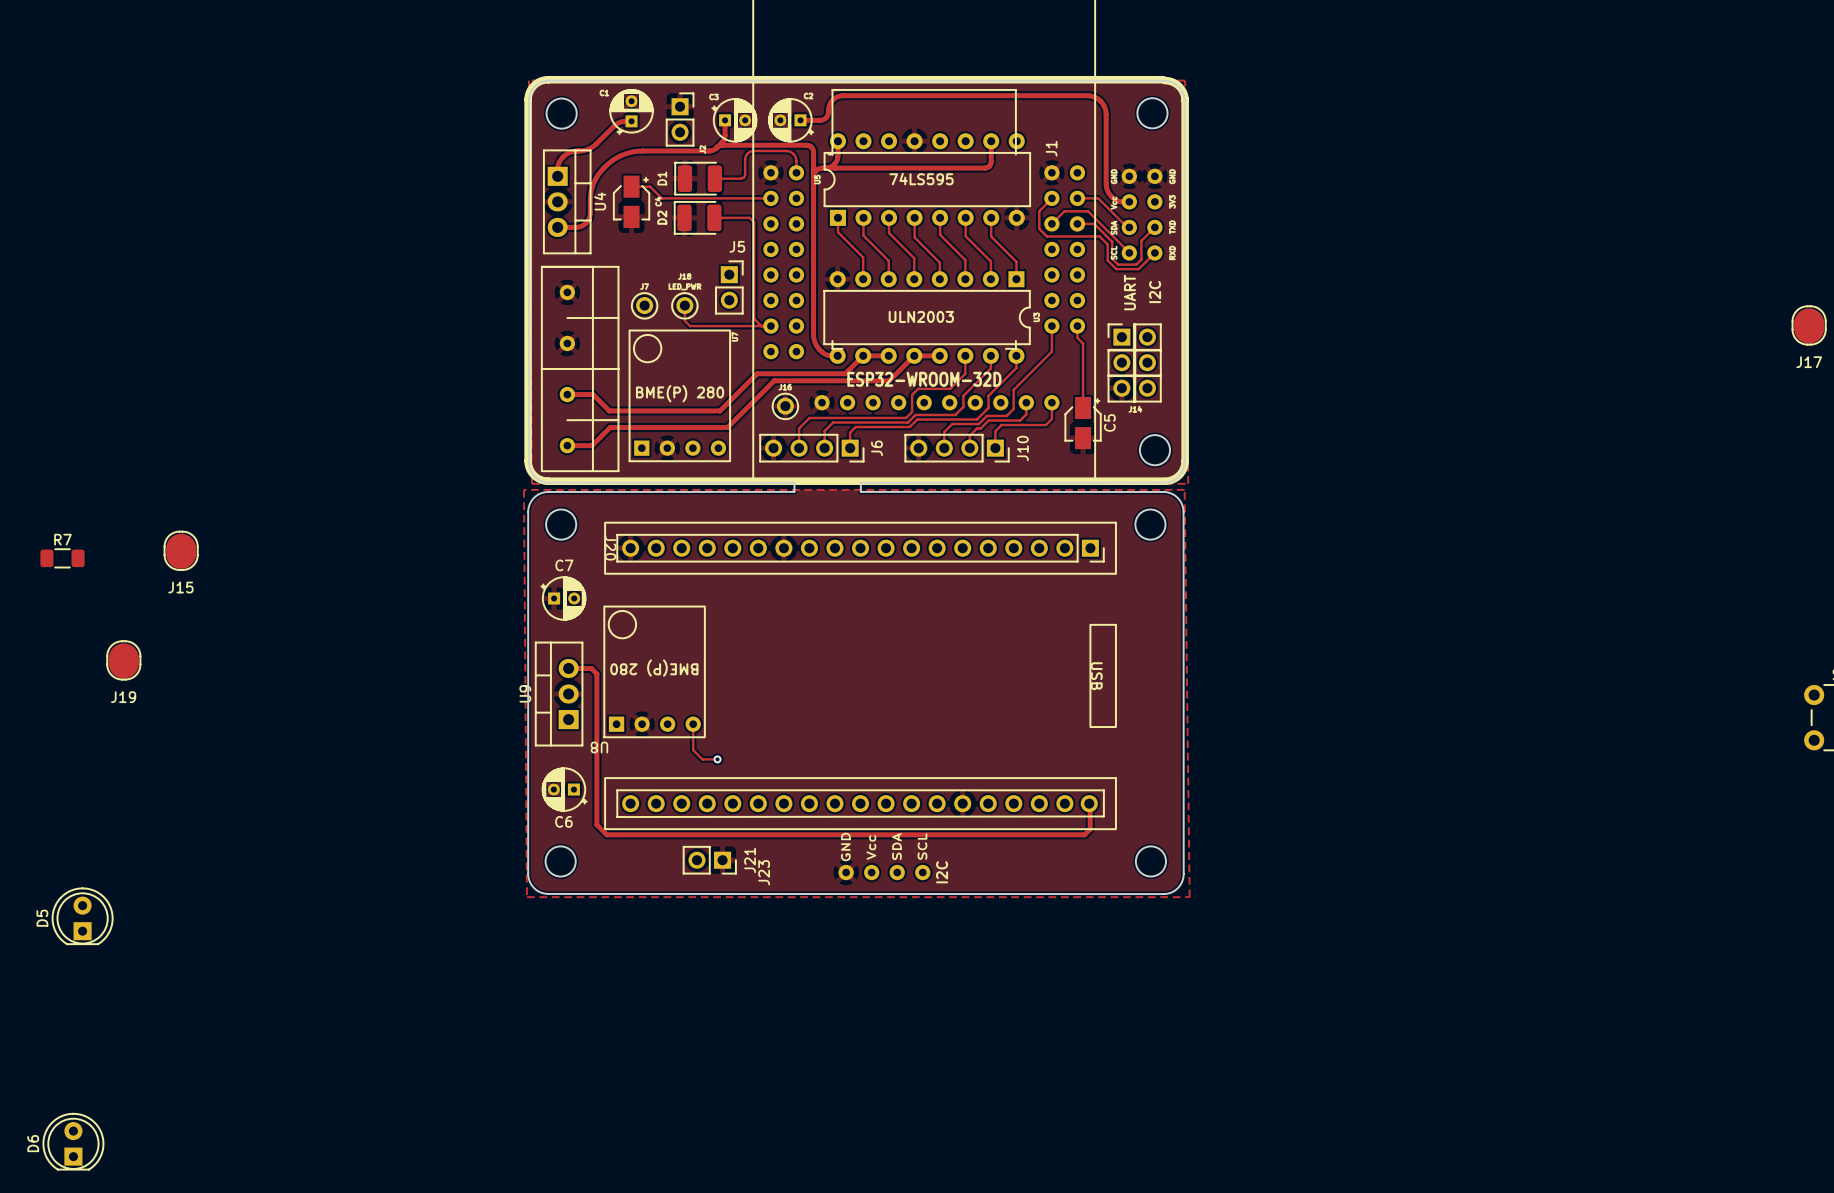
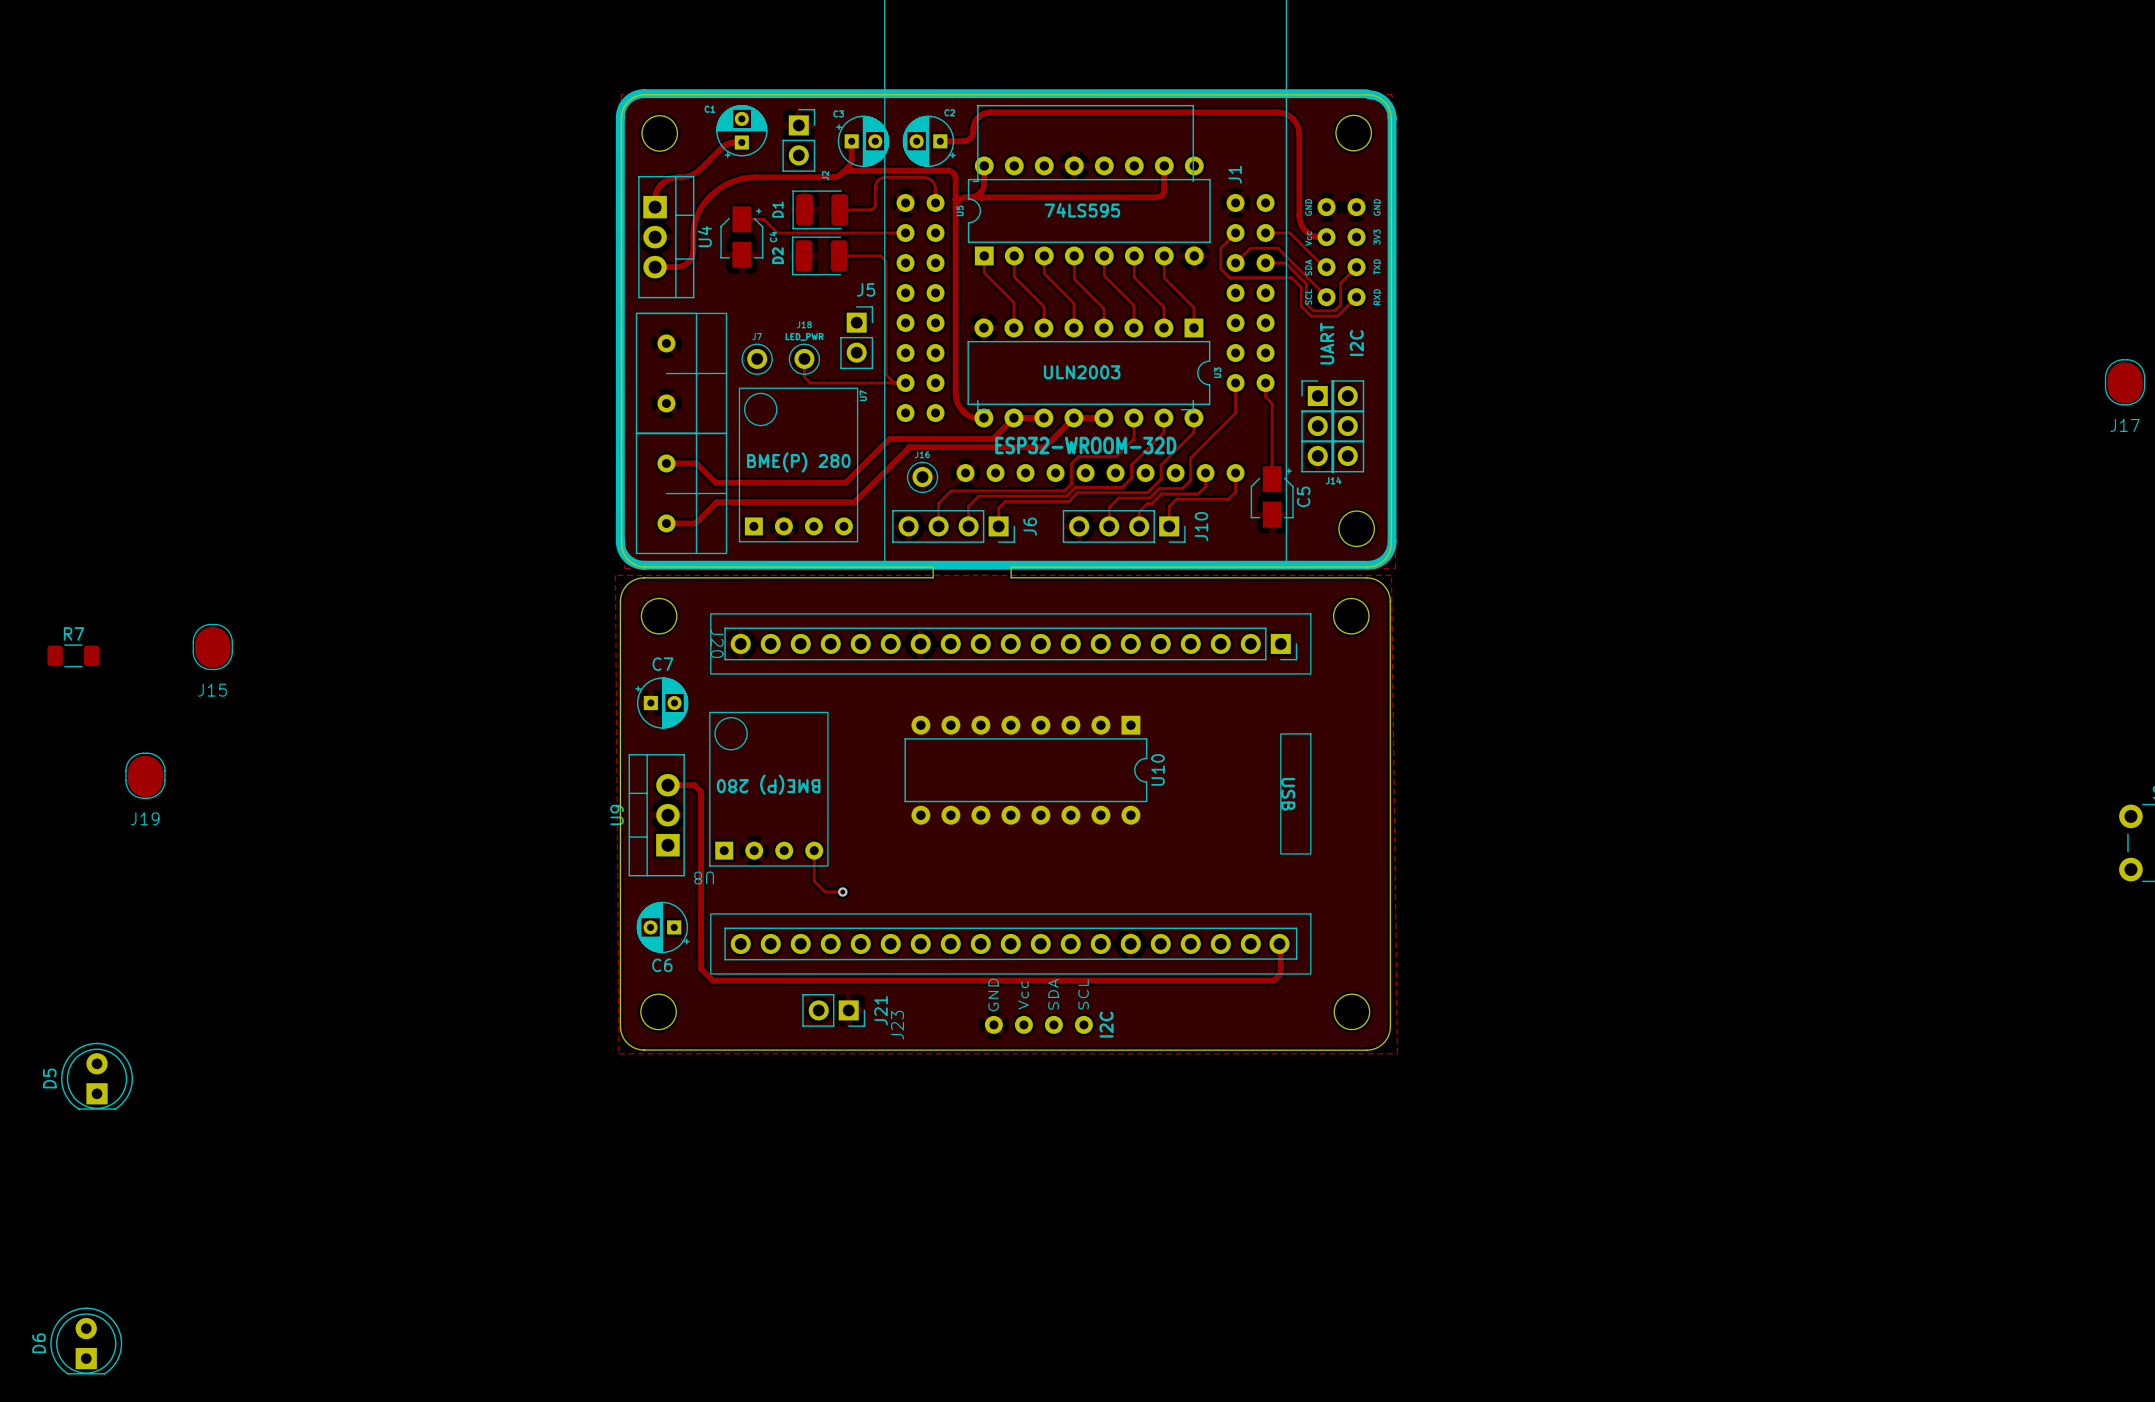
U10: none -> (1025, 770)

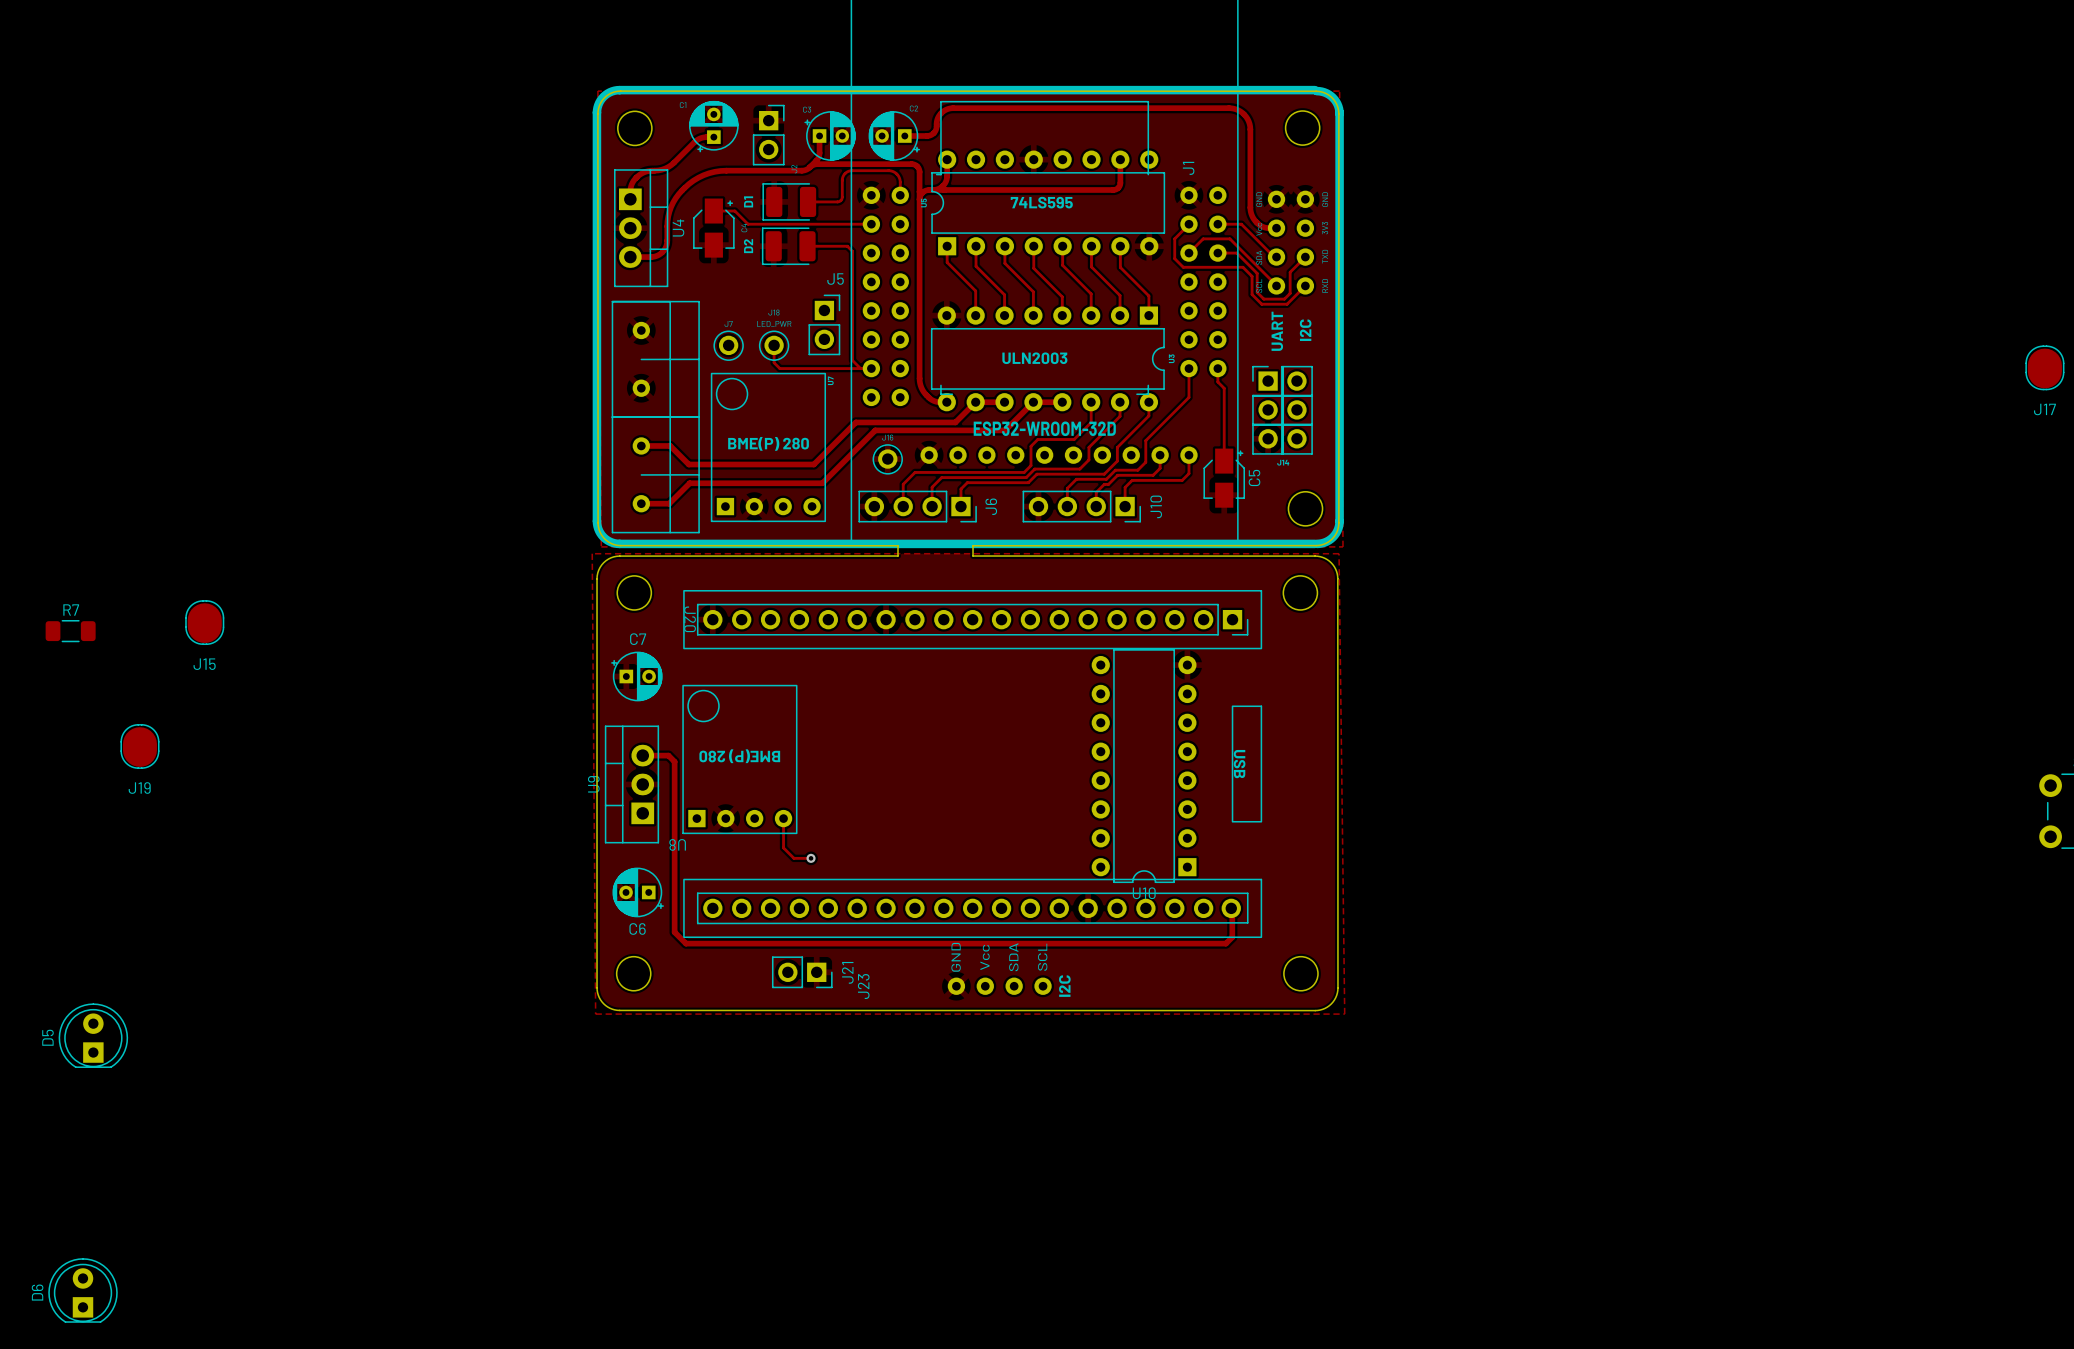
U10 rotation: 0° (1025, 770) -> 90° clockwise (1144, 766)
U10 position: (1025, 770) -> (1144, 766)

